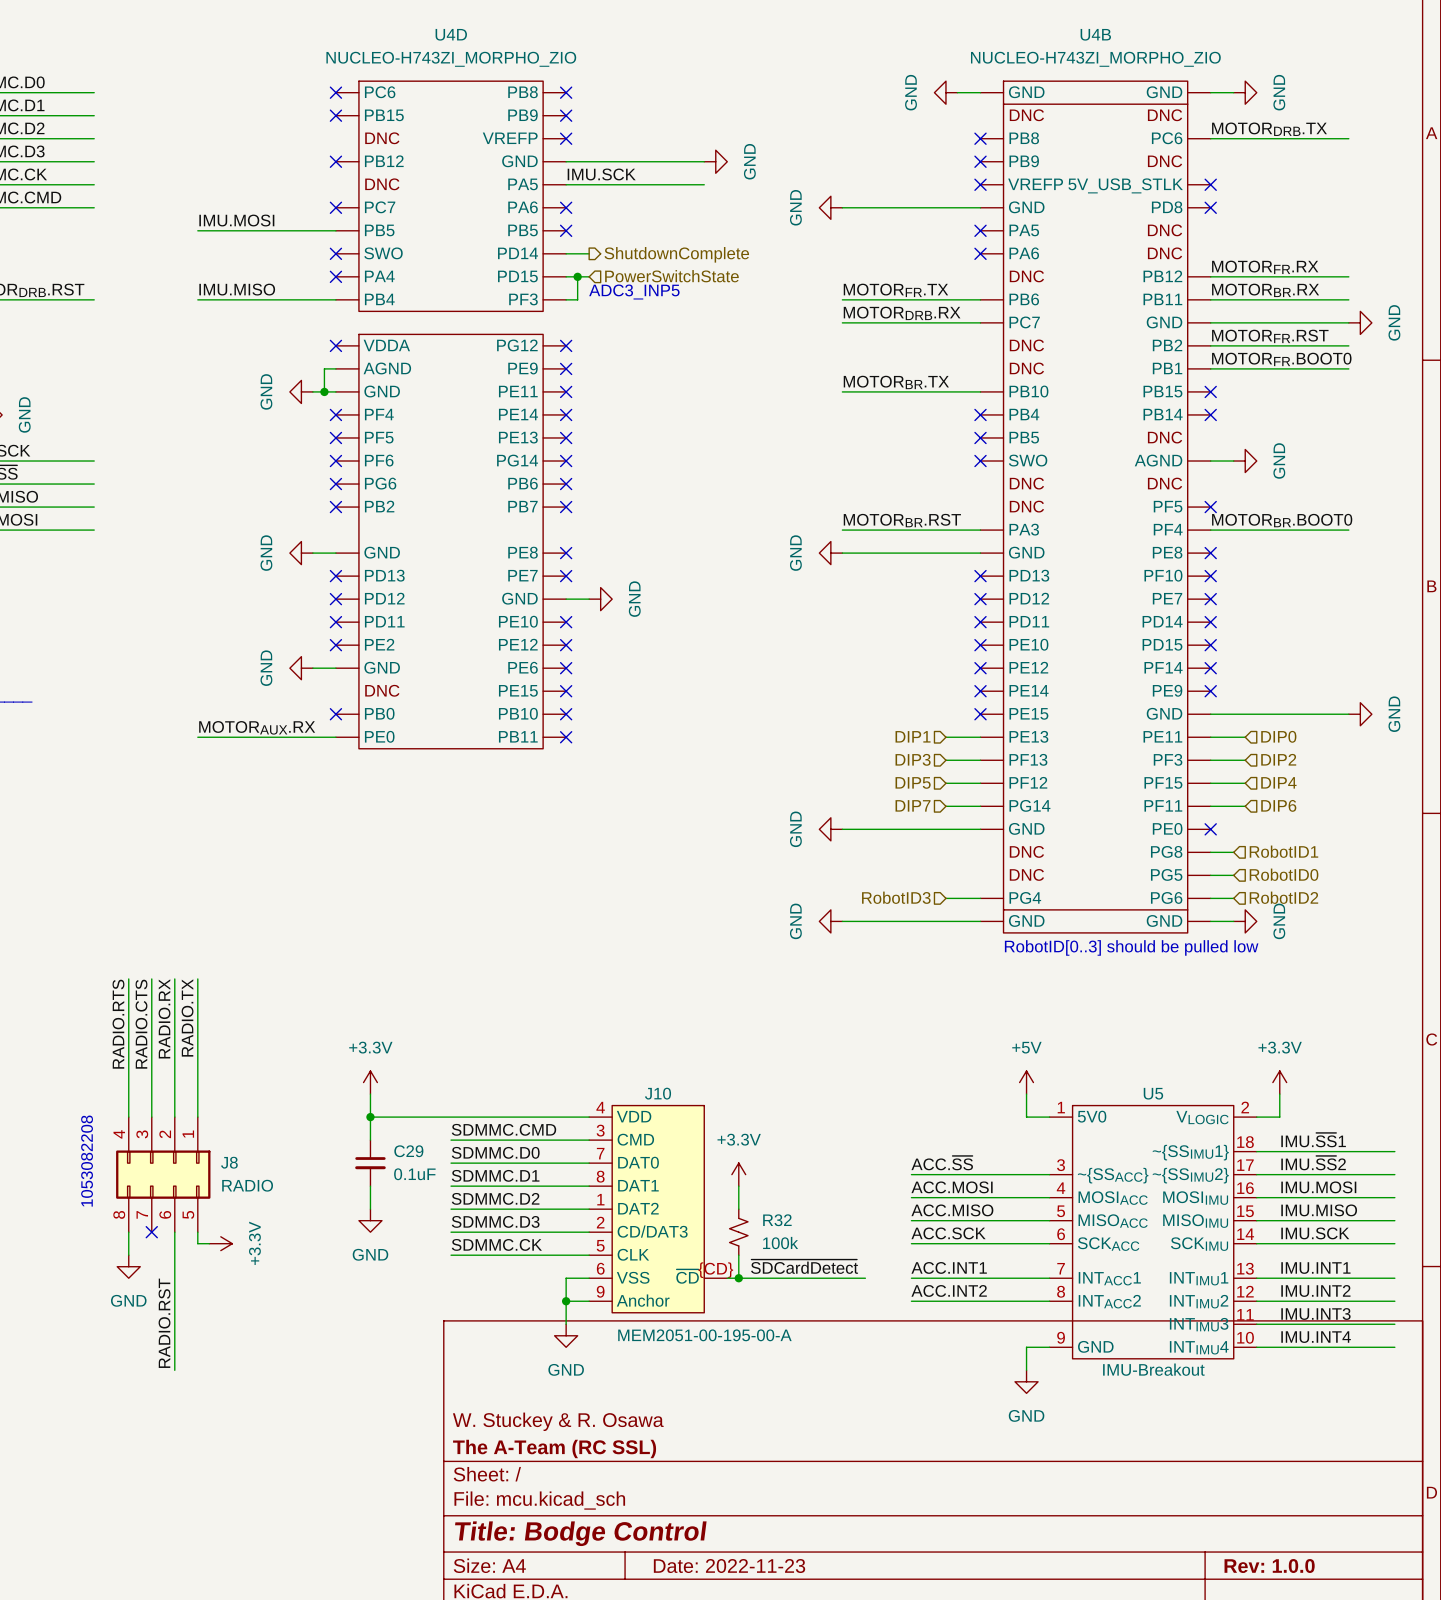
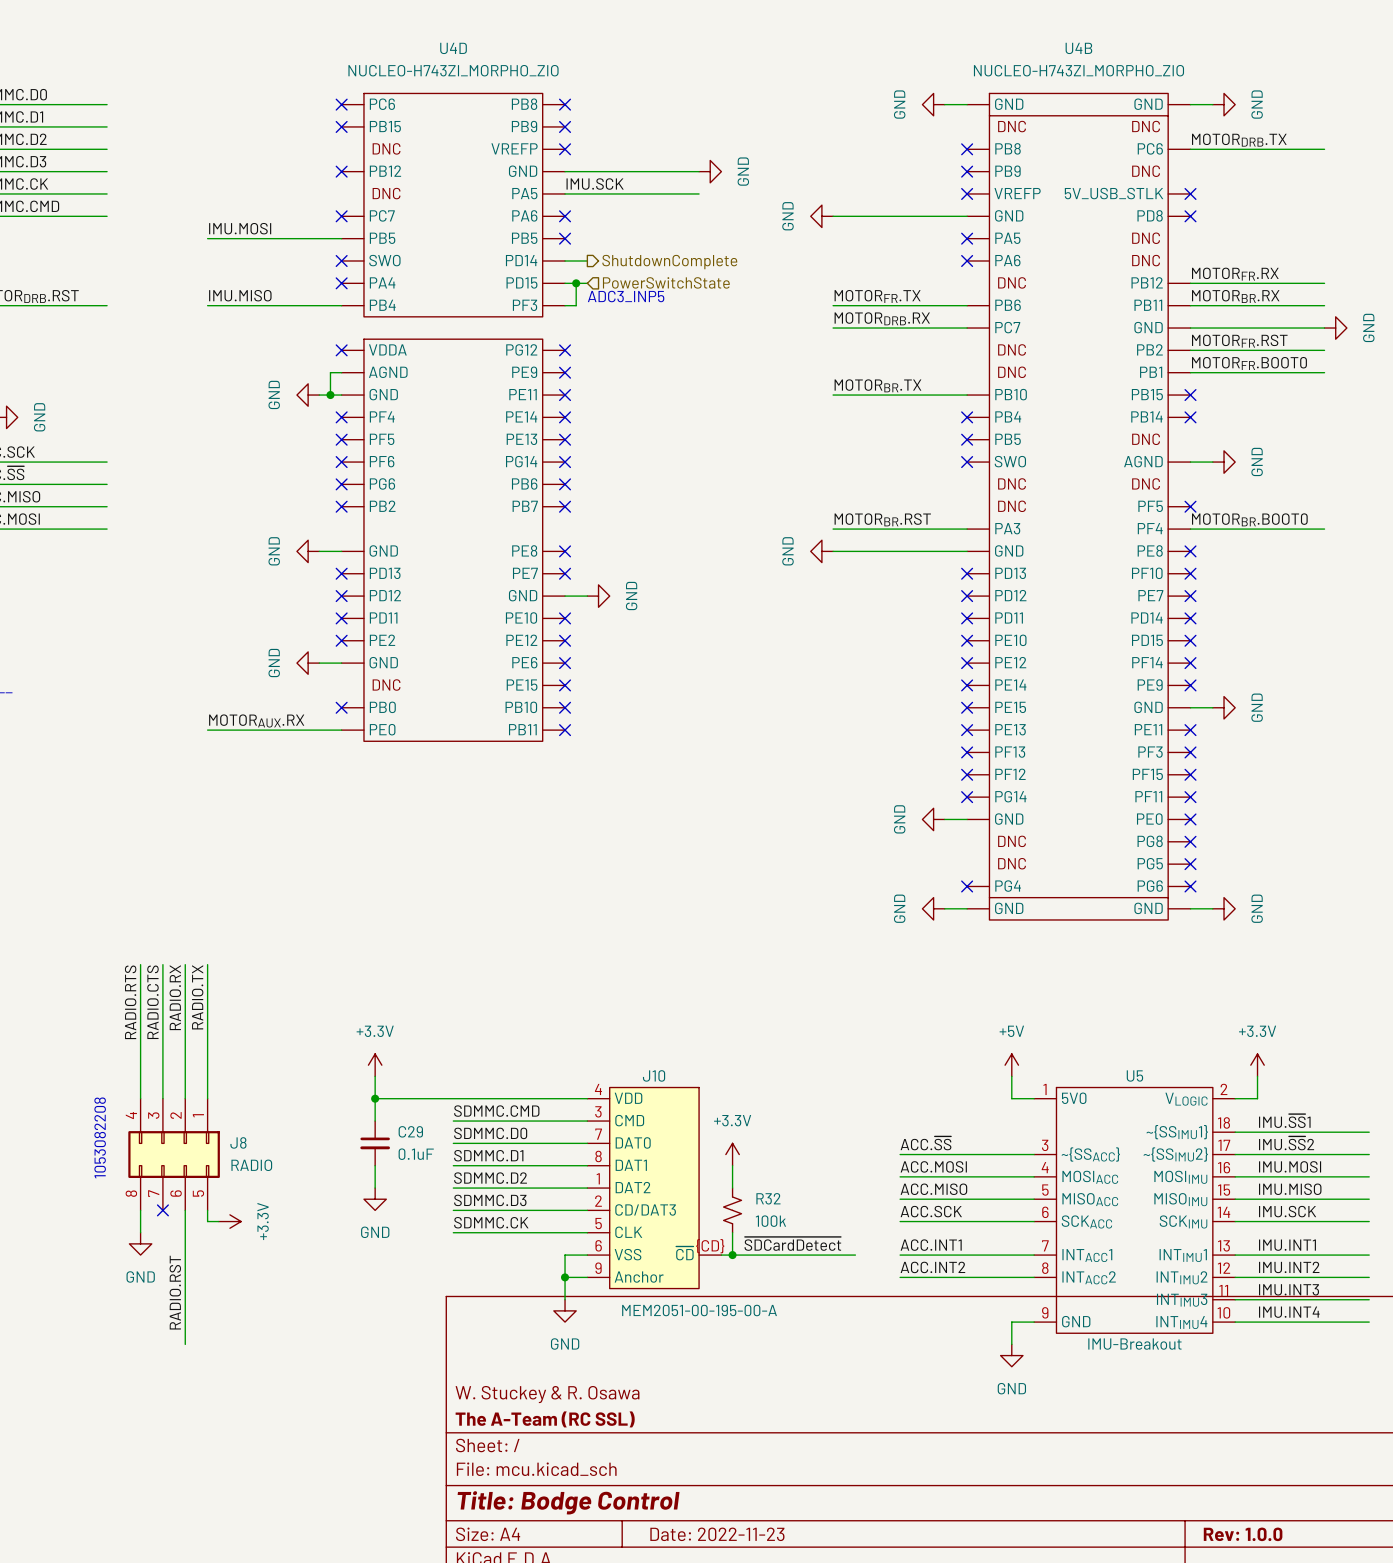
wire: (1233, 714) (1348, 714) -> none
power symbol position: GND (1360, 714) -> GND (1224, 707)
hierarchical label: DIP1 (913, 736) -> none
hierarchical label: DIP0 (1278, 736) -> none
wire: (945, 737) (980, 737) -> none
no-connect mark: none -> (967, 730)
wire: (1210, 737) (1245, 737) -> none
no-connect mark: none -> (1190, 730)
hierarchical label: DIP3 (913, 759) -> none
hierarchical label: DIP2 (1278, 759) -> none
wire: (945, 760) (980, 760) -> none
no-connect mark: none -> (967, 752)
wire: (1210, 760) (1245, 760) -> none
no-connect mark: none -> (1190, 752)
hierarchical label: DIP5 (913, 782) -> none
hierarchical label: DIP4 (1278, 782) -> none
wire: (945, 783) (980, 783) -> none
no-connect mark: none -> (967, 774)
wire: (1210, 783) (1245, 783) -> none
no-connect mark: none -> (1190, 774)
hierarchical label: DIP7 (913, 805) -> none
hierarchical label: DIP6 (1278, 805) -> none
wire: (945, 806) (980, 806) -> none
no-connect mark: none -> (967, 797)
wire: (1210, 806) (1245, 806) -> none
no-connect mark: none -> (1190, 797)
power symbol: GND (830, 829) -> none
wire: (842, 829) (957, 829) -> none
power symbol: none -> GND (933, 819)
hierarchical label: RobotID1 (1283, 851) -> none
wire: (1210, 852) (1233, 852) -> none
no-connect mark: none -> (1190, 841)
hierarchical label: RobotID0 (1284, 874) -> none
wire: (1210, 875) (1233, 875) -> none
no-connect mark: none -> (1190, 864)
hierarchical label: RobotID3 (896, 897) -> none
hierarchical label: RobotID2 (1283, 897) -> none
wire: (945, 898) (980, 898) -> none
no-connect mark: none -> (967, 886)
wire: (1210, 898) (1233, 898) -> none
no-connect mark: none -> (1190, 886)
power symbol: GND (830, 921) -> none
wire: (842, 921) (957, 921) -> none
power symbol: none -> GND (933, 908)
text: RobotID[0..3] should be pulled low (1131, 947) -> none

